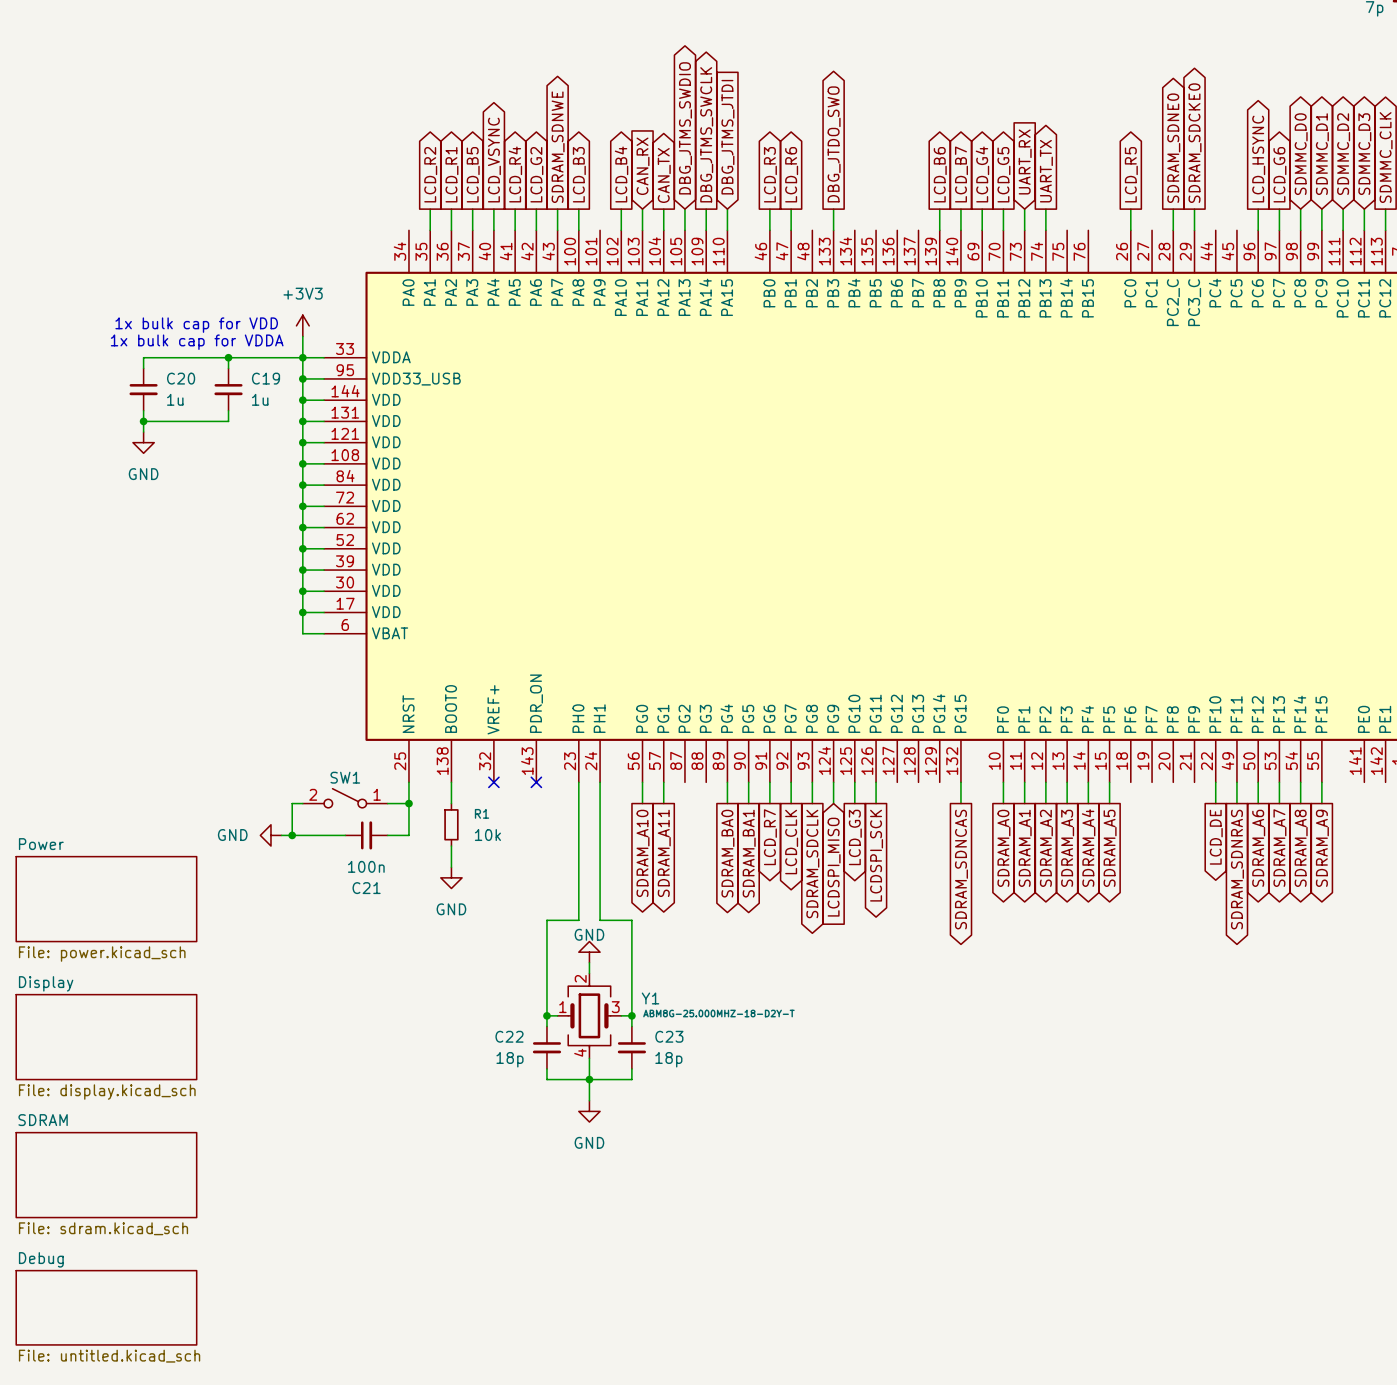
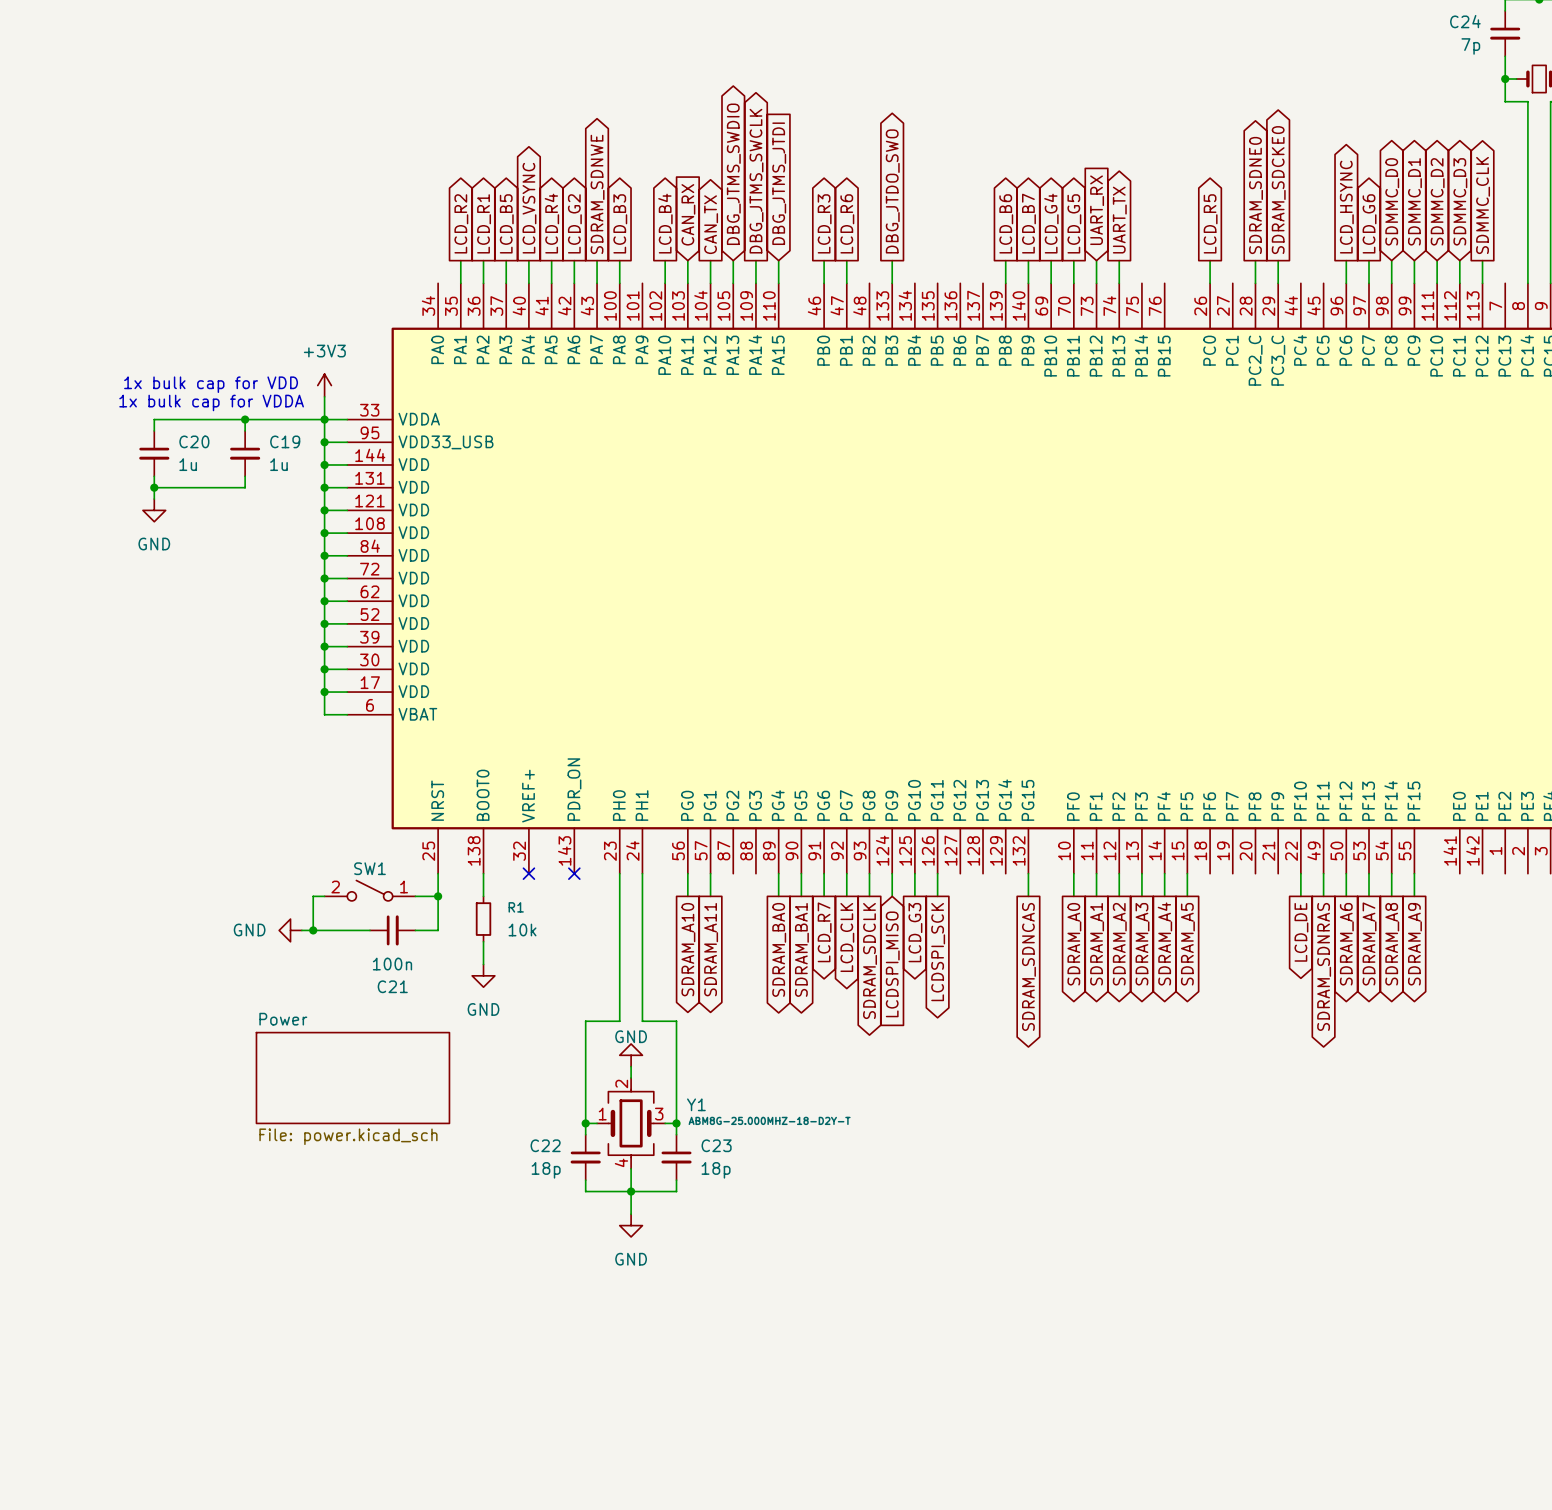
sheet Power: File: power.kicad_sch (106, 899) -> none
sheet Power: none -> File: power.kicad_sch (352, 1078)
sheet Display: File: display.kicad_sch (106, 1037) -> none
sheet SDRAM: File: sdram.kicad_sch (106, 1175) -> none
sheet Debug: File: untitled.kicad_sch (106, 1307) -> none

